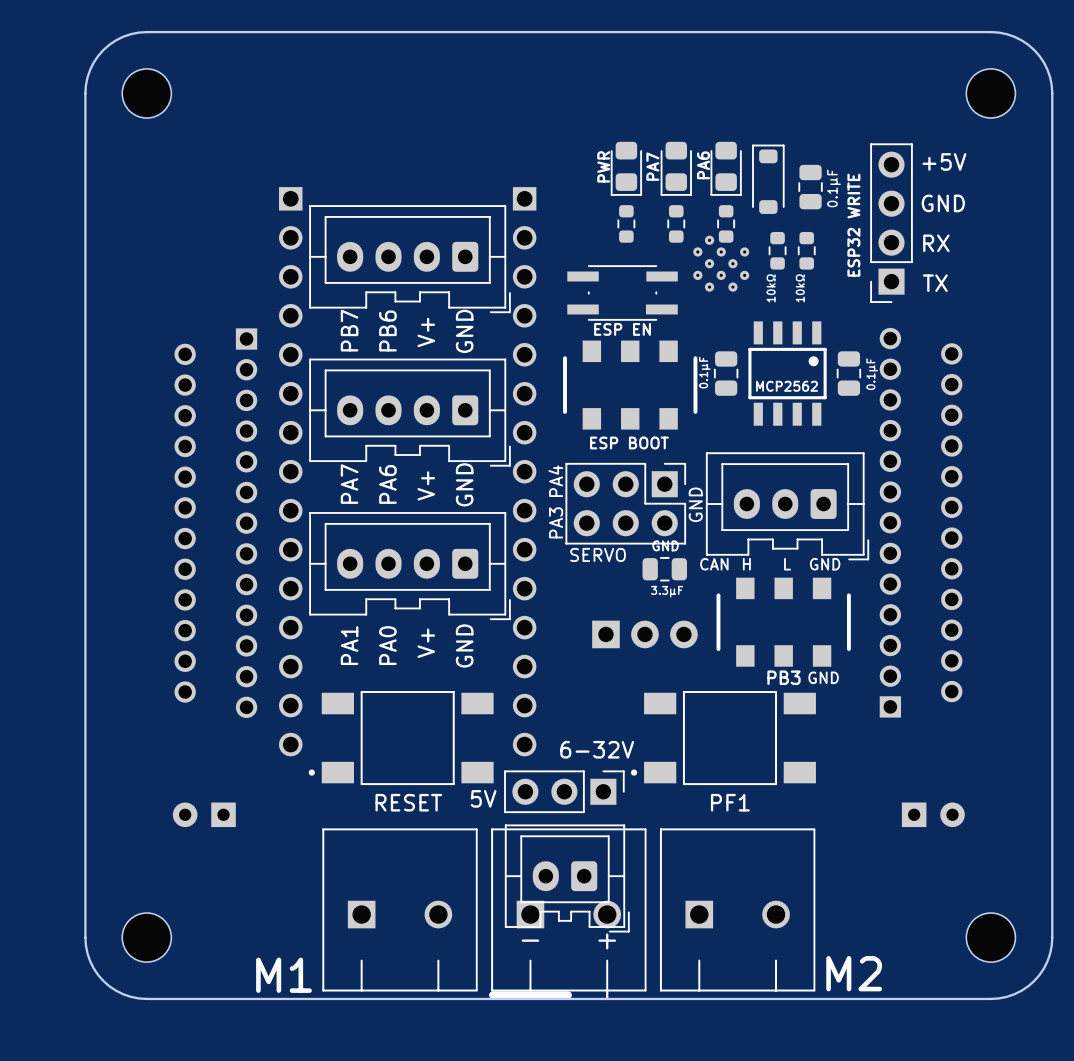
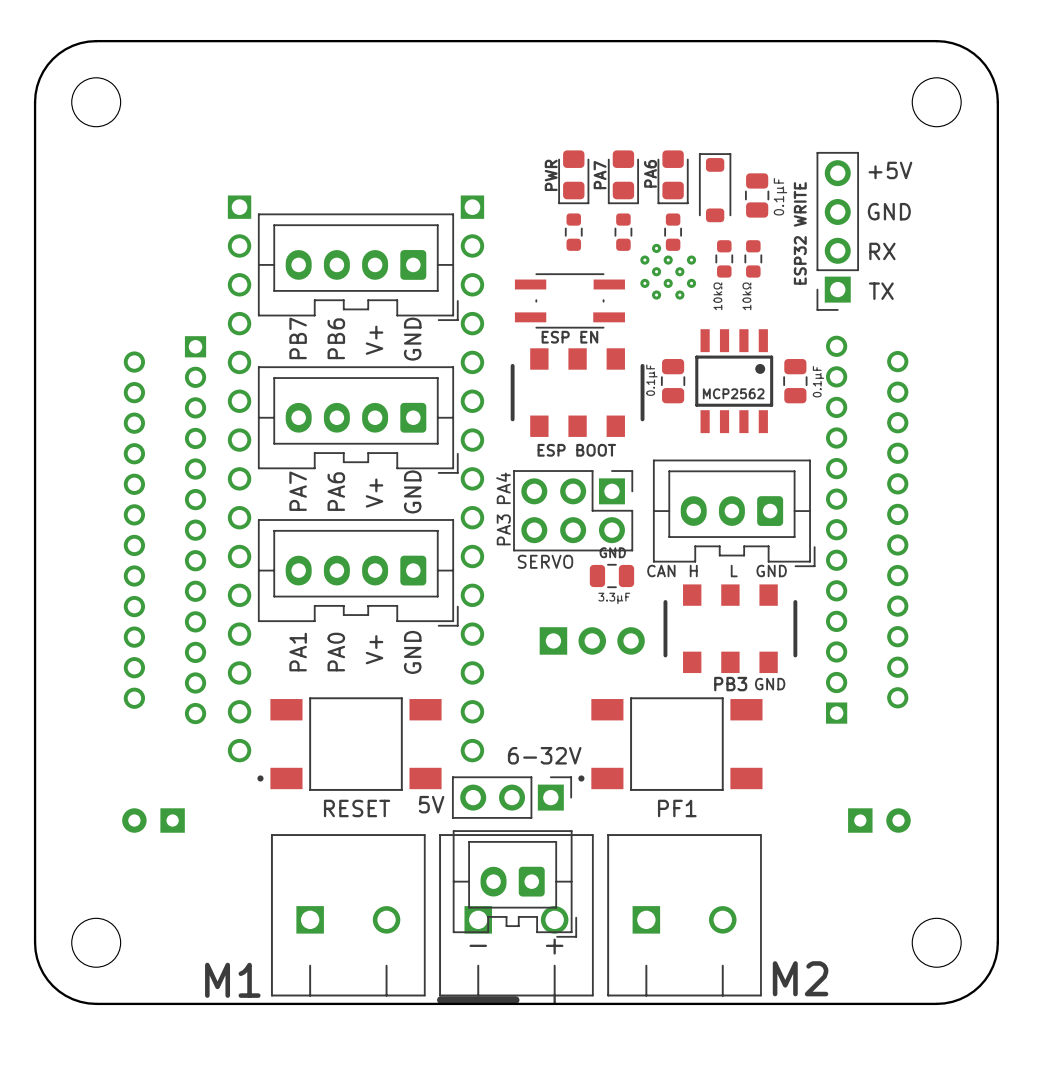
text: GND (695, 504) -> none

